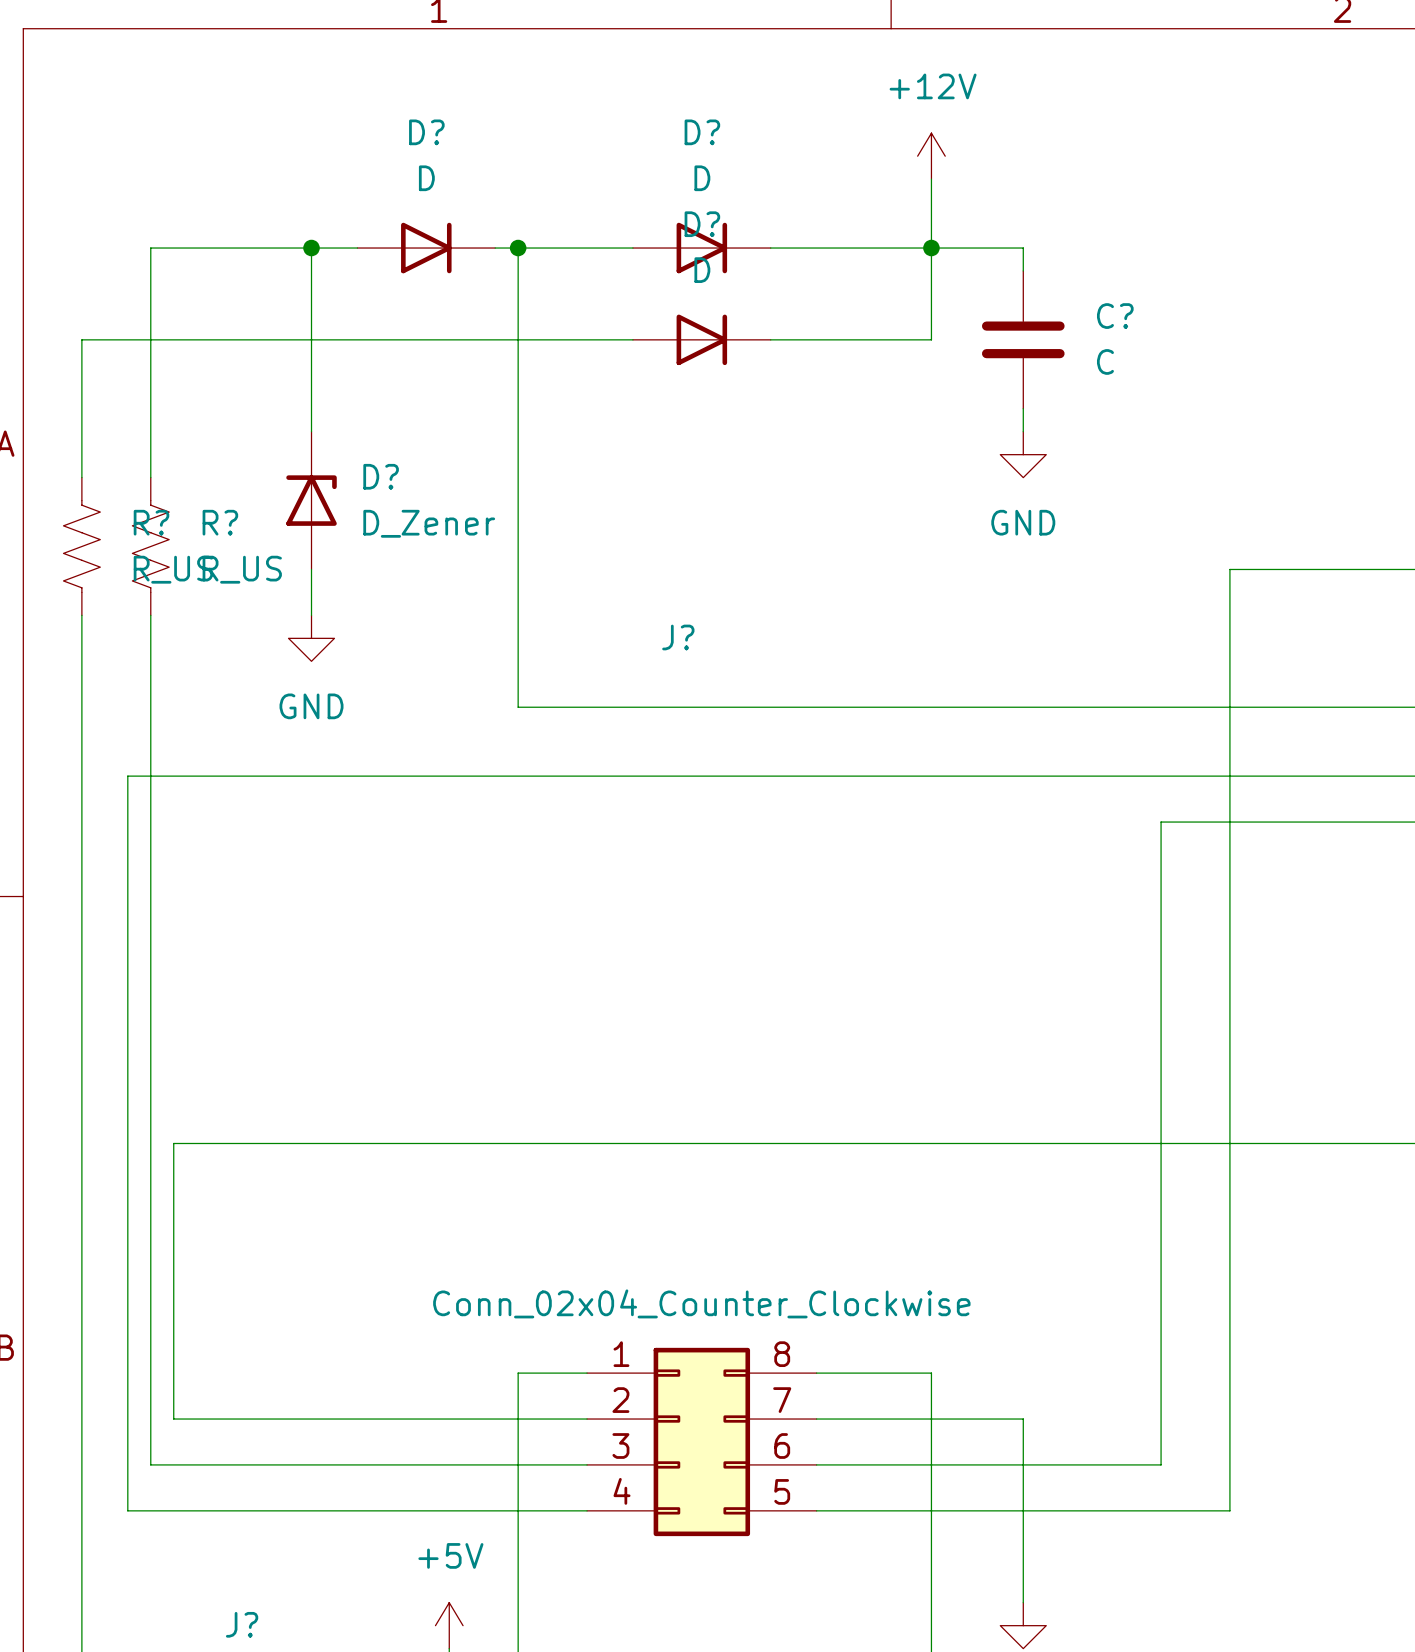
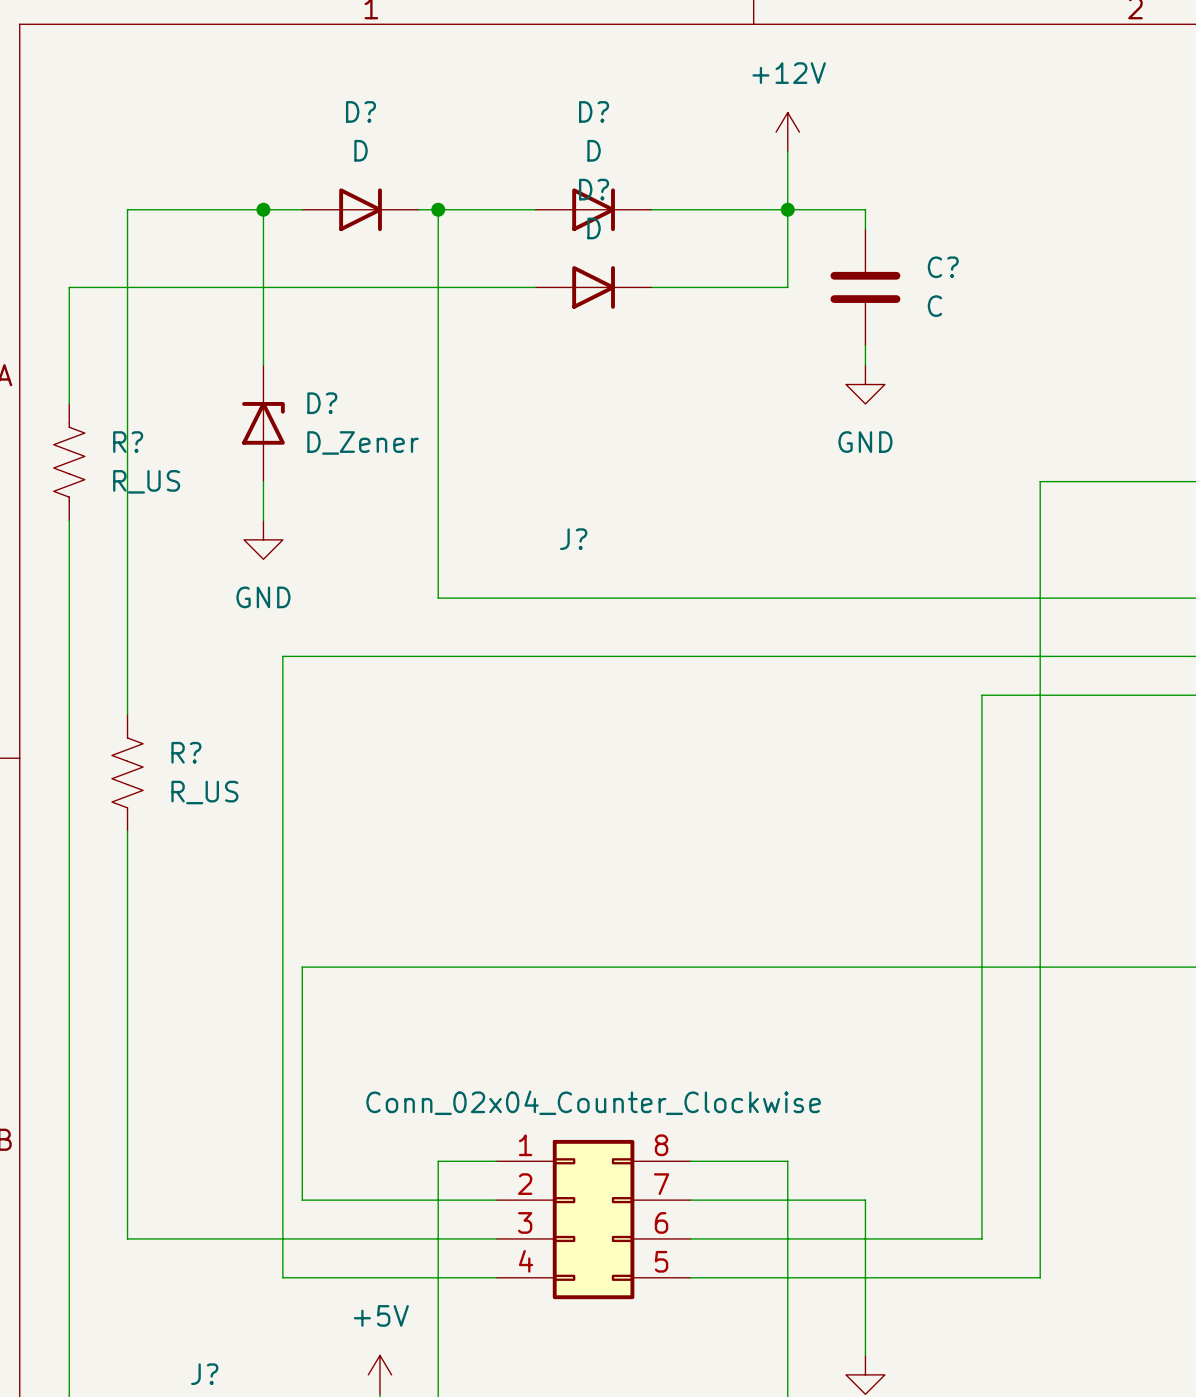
R? position: (150, 546) -> (127, 772)
wire: (334, 776) (127, 776) (127, 1510) (334, 1510) -> (282, 656) (282, 1277)
wire: (150, 845) (150, 982) -> (127, 403) (127, 520)
wire: (357, 1143) (173, 1143) (173, 1419) (357, 1419) -> (302, 967) (302, 1200)

